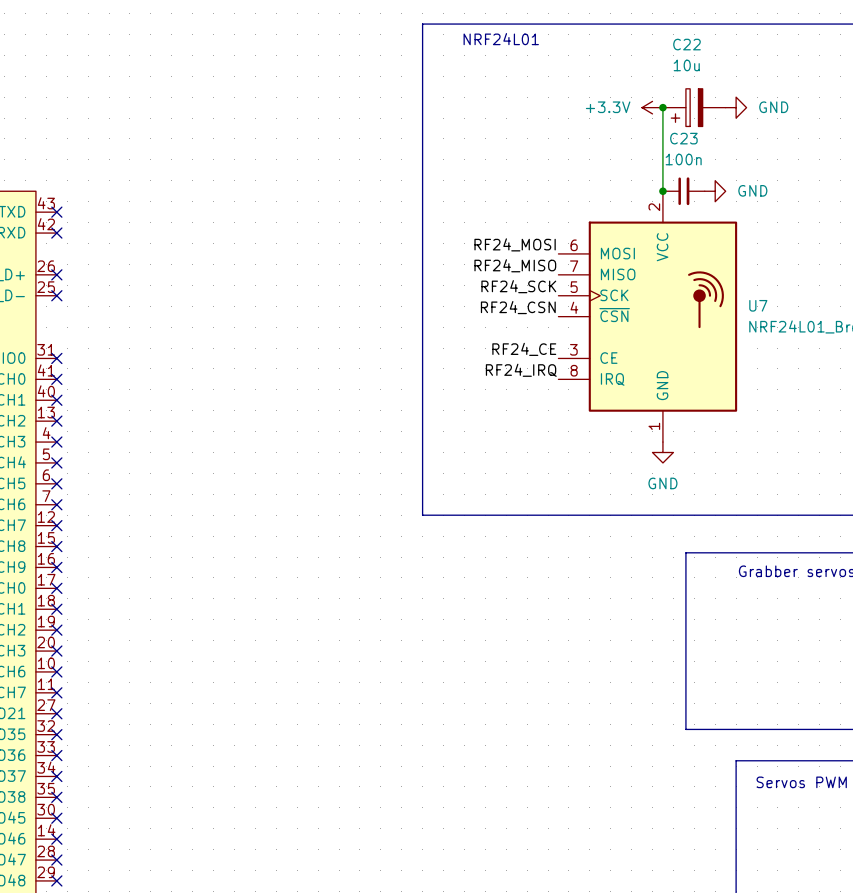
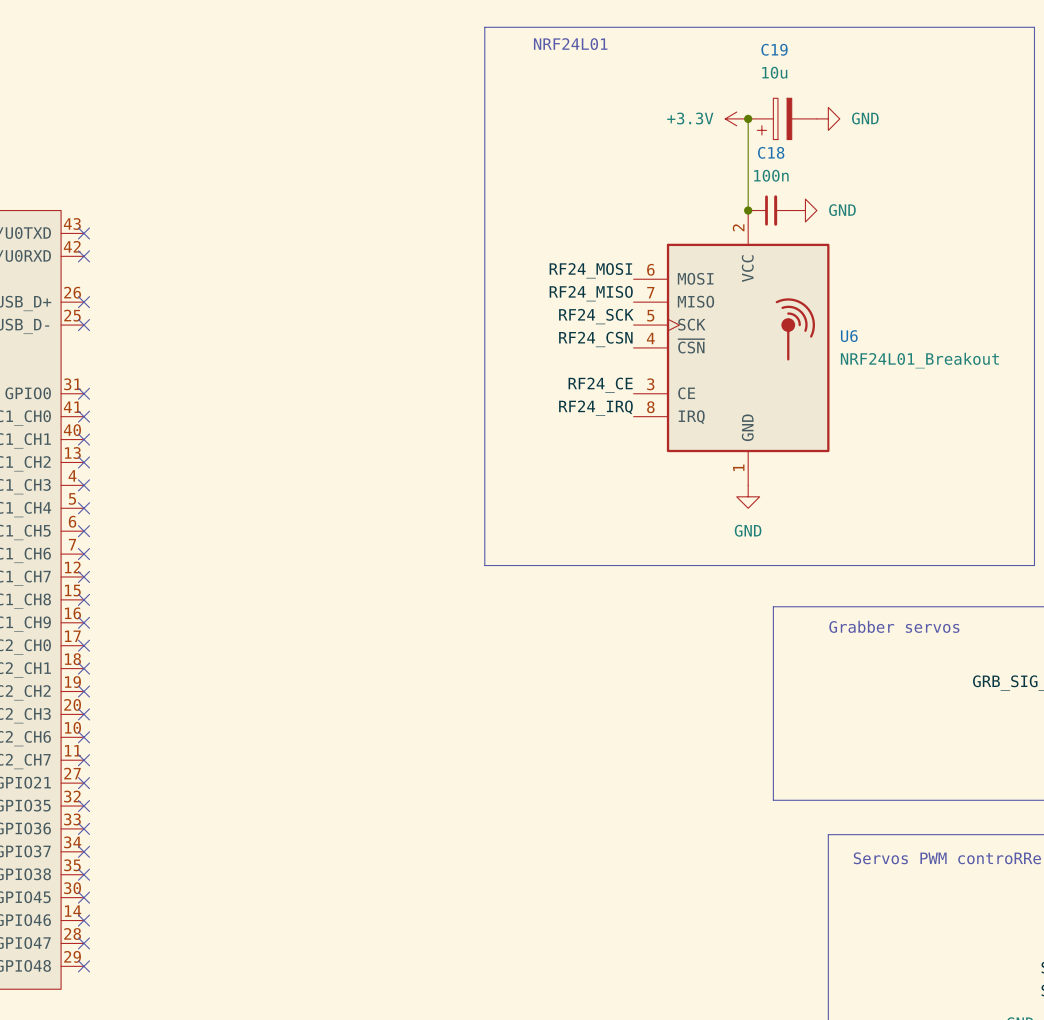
C22 name: C22 (686, 44) -> C19 (774, 49)
C23 name: C23 (683, 138) -> C18 (771, 152)
U7 name: U7 (758, 305) -> U6 (849, 336)

